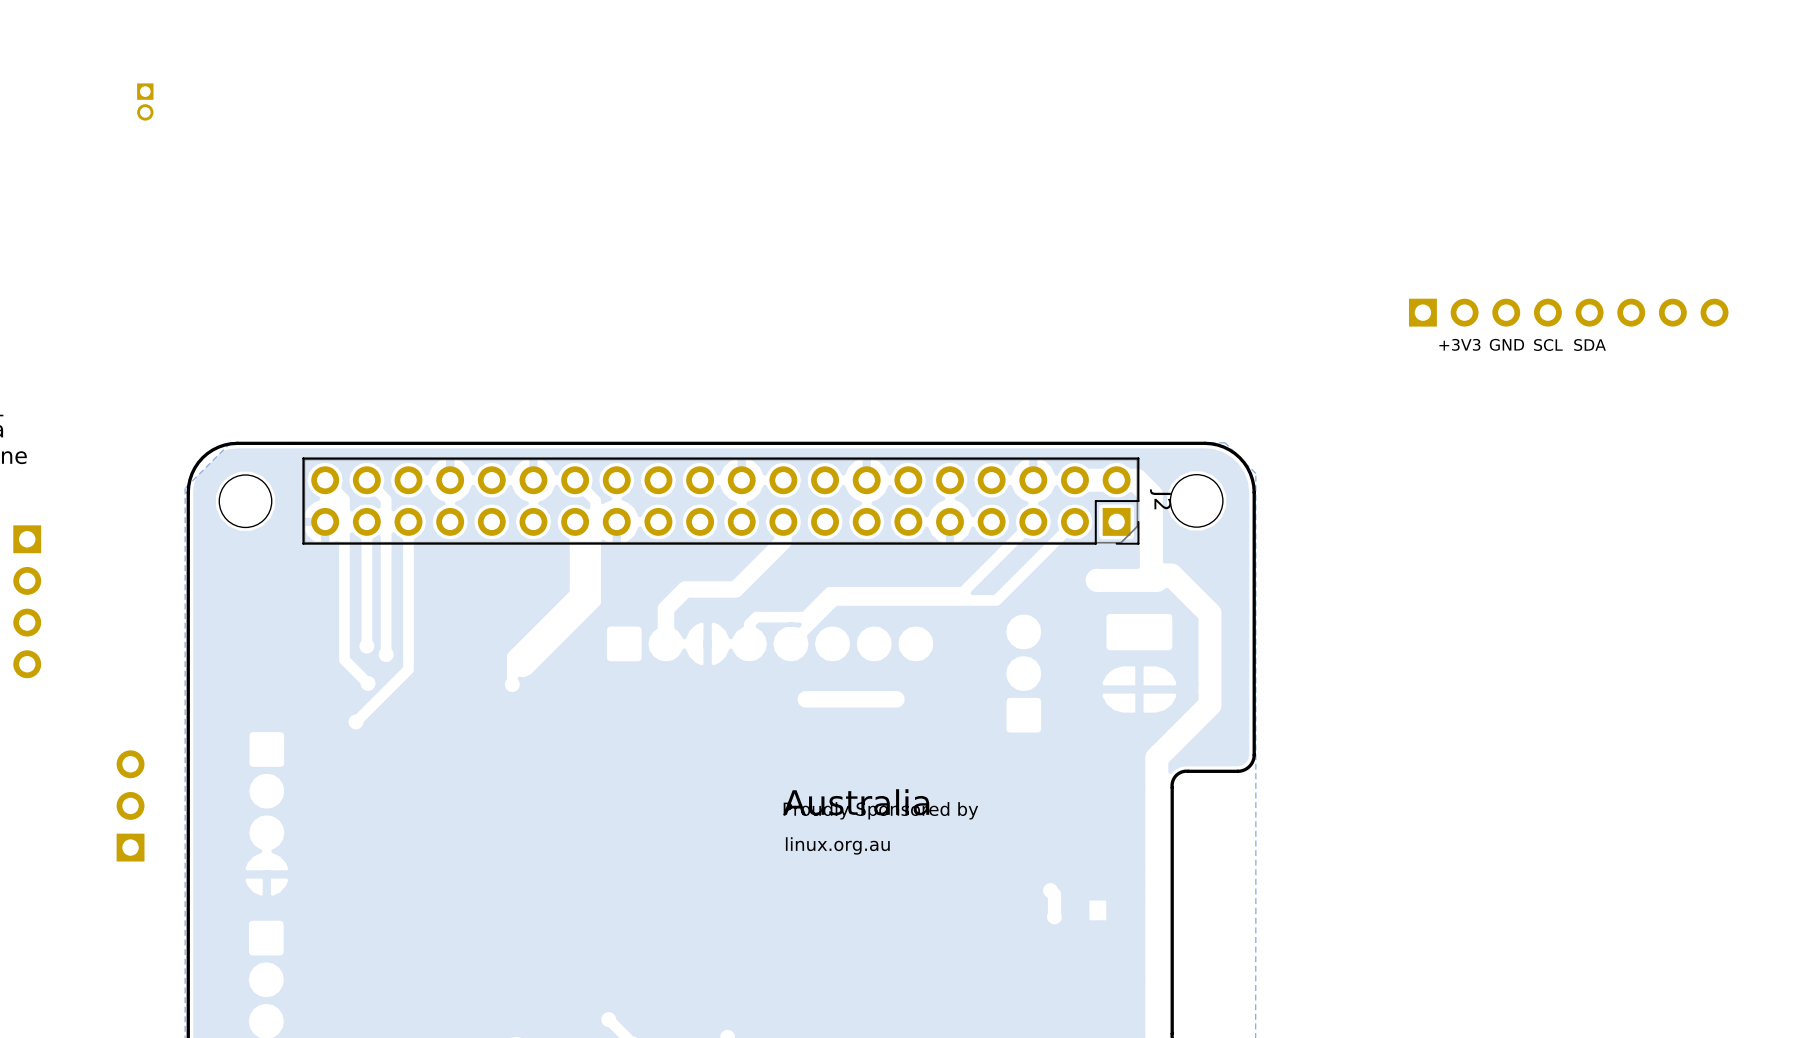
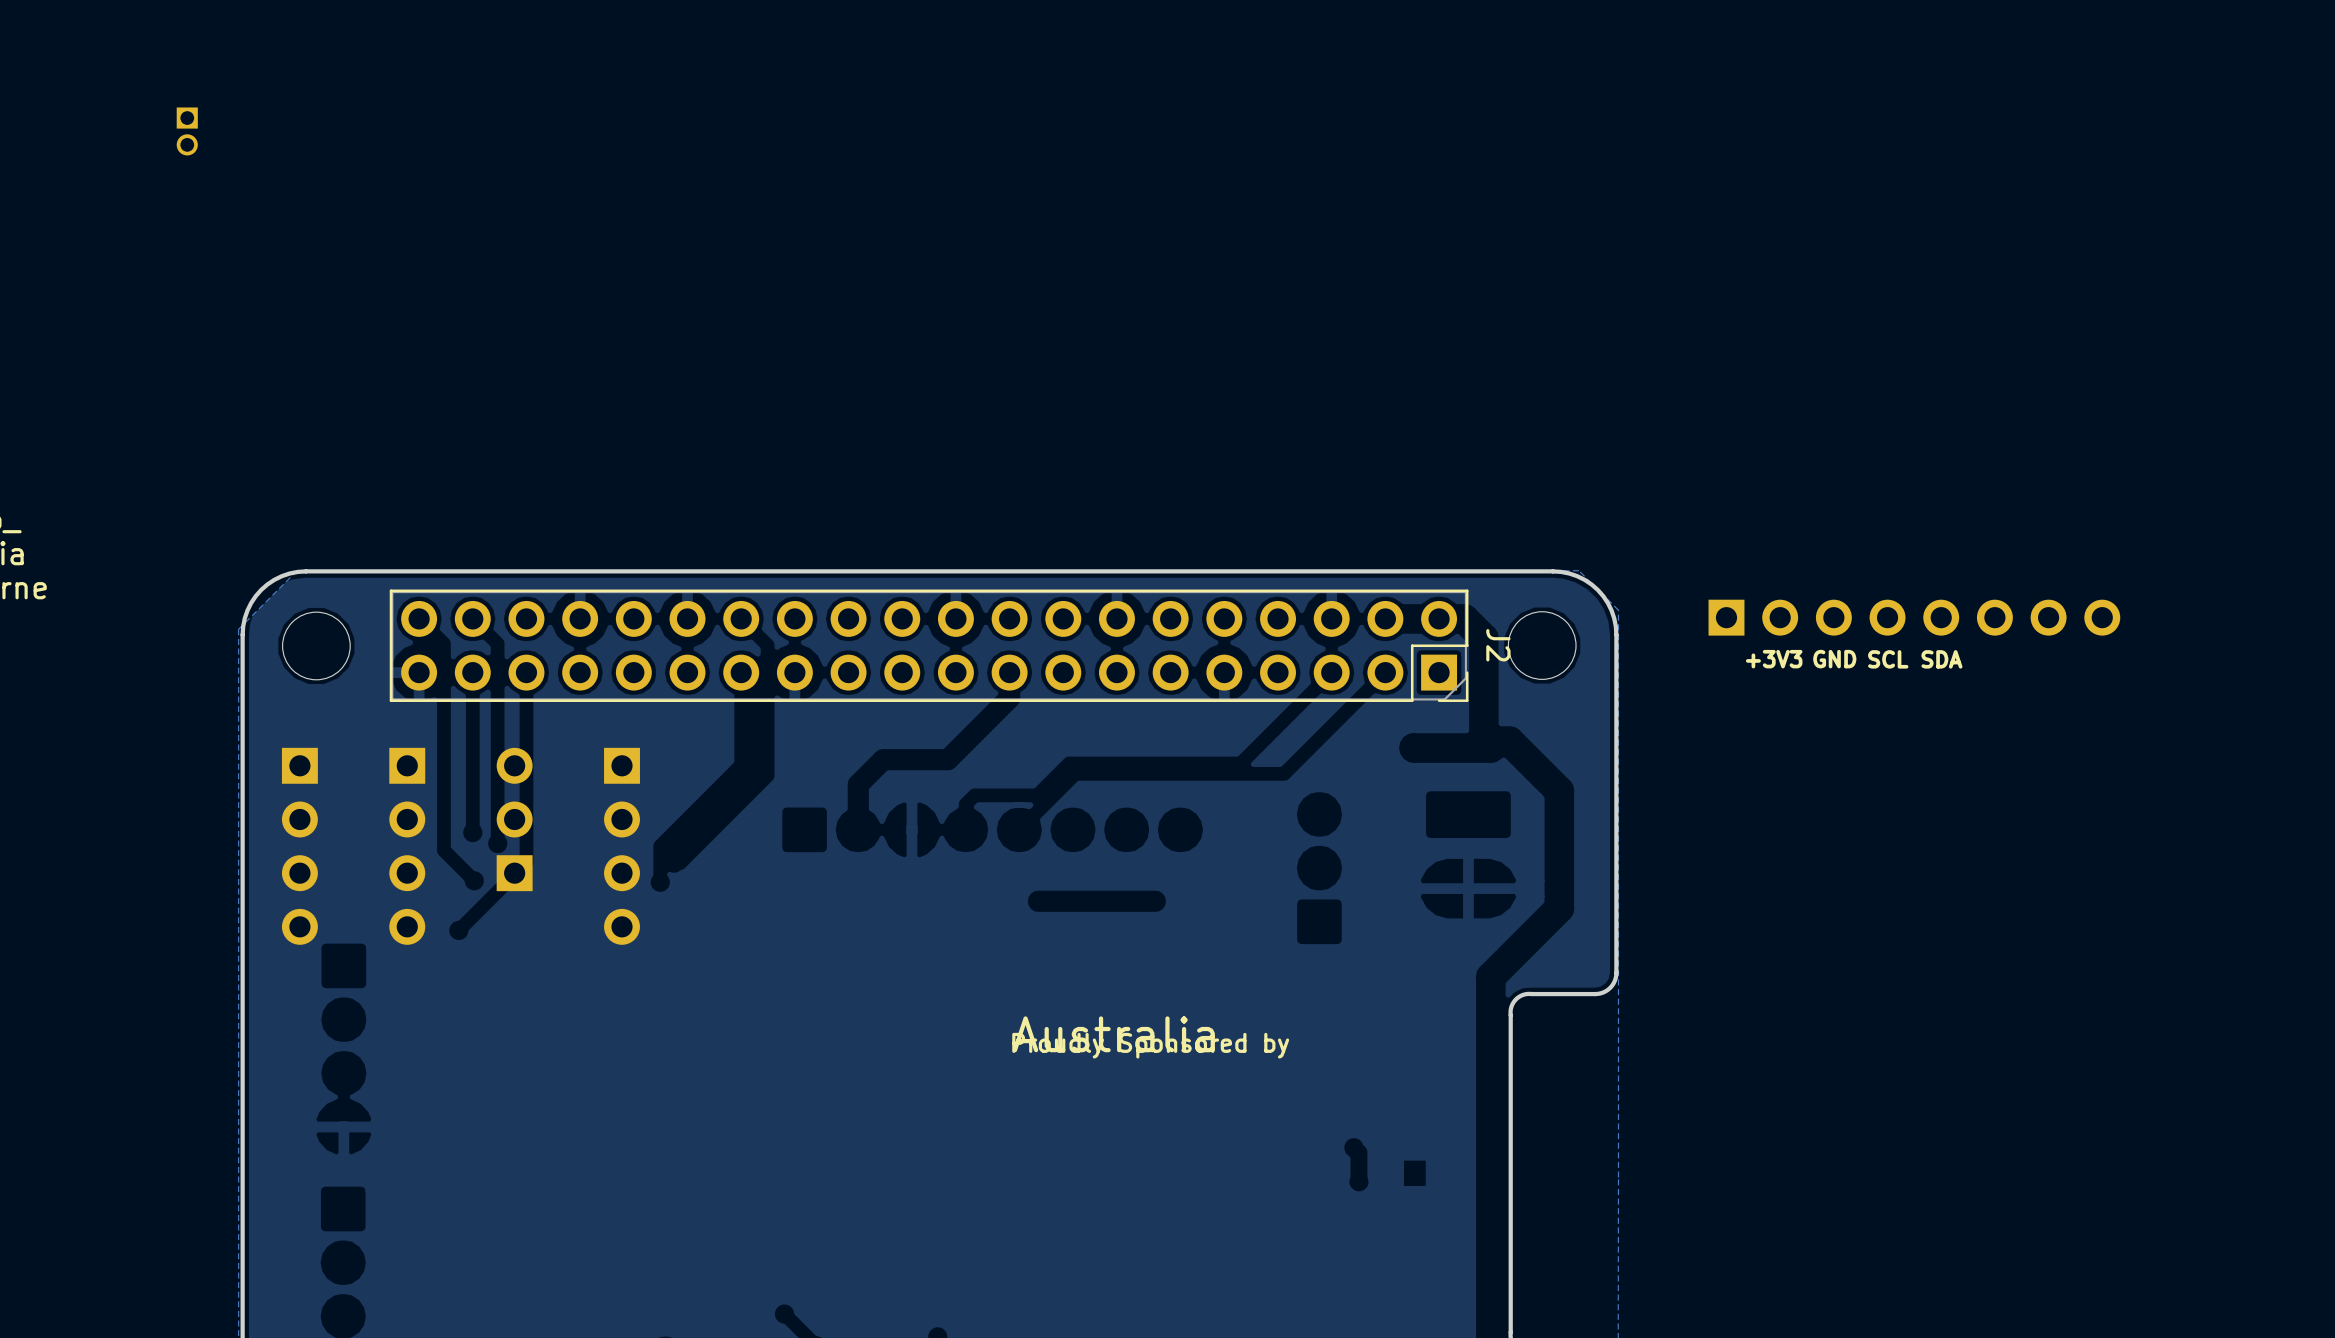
part position: (1568, 312) -> (1914, 617)
text position: +3V3 (1459, 344) -> +3V3 (1774, 659)
text position: GND (1506, 344) -> GND (1834, 659)
text position: SCL (1548, 345) -> SCL (1888, 659)
text position: SDA (1590, 345) -> SDA (1941, 659)
part: (27, 601) -> none
part: none -> (299, 846)
part: none -> (407, 846)
part: none -> (622, 846)
part position: (130, 805) -> (514, 819)
text: linux.org.au (837, 845) -> none

